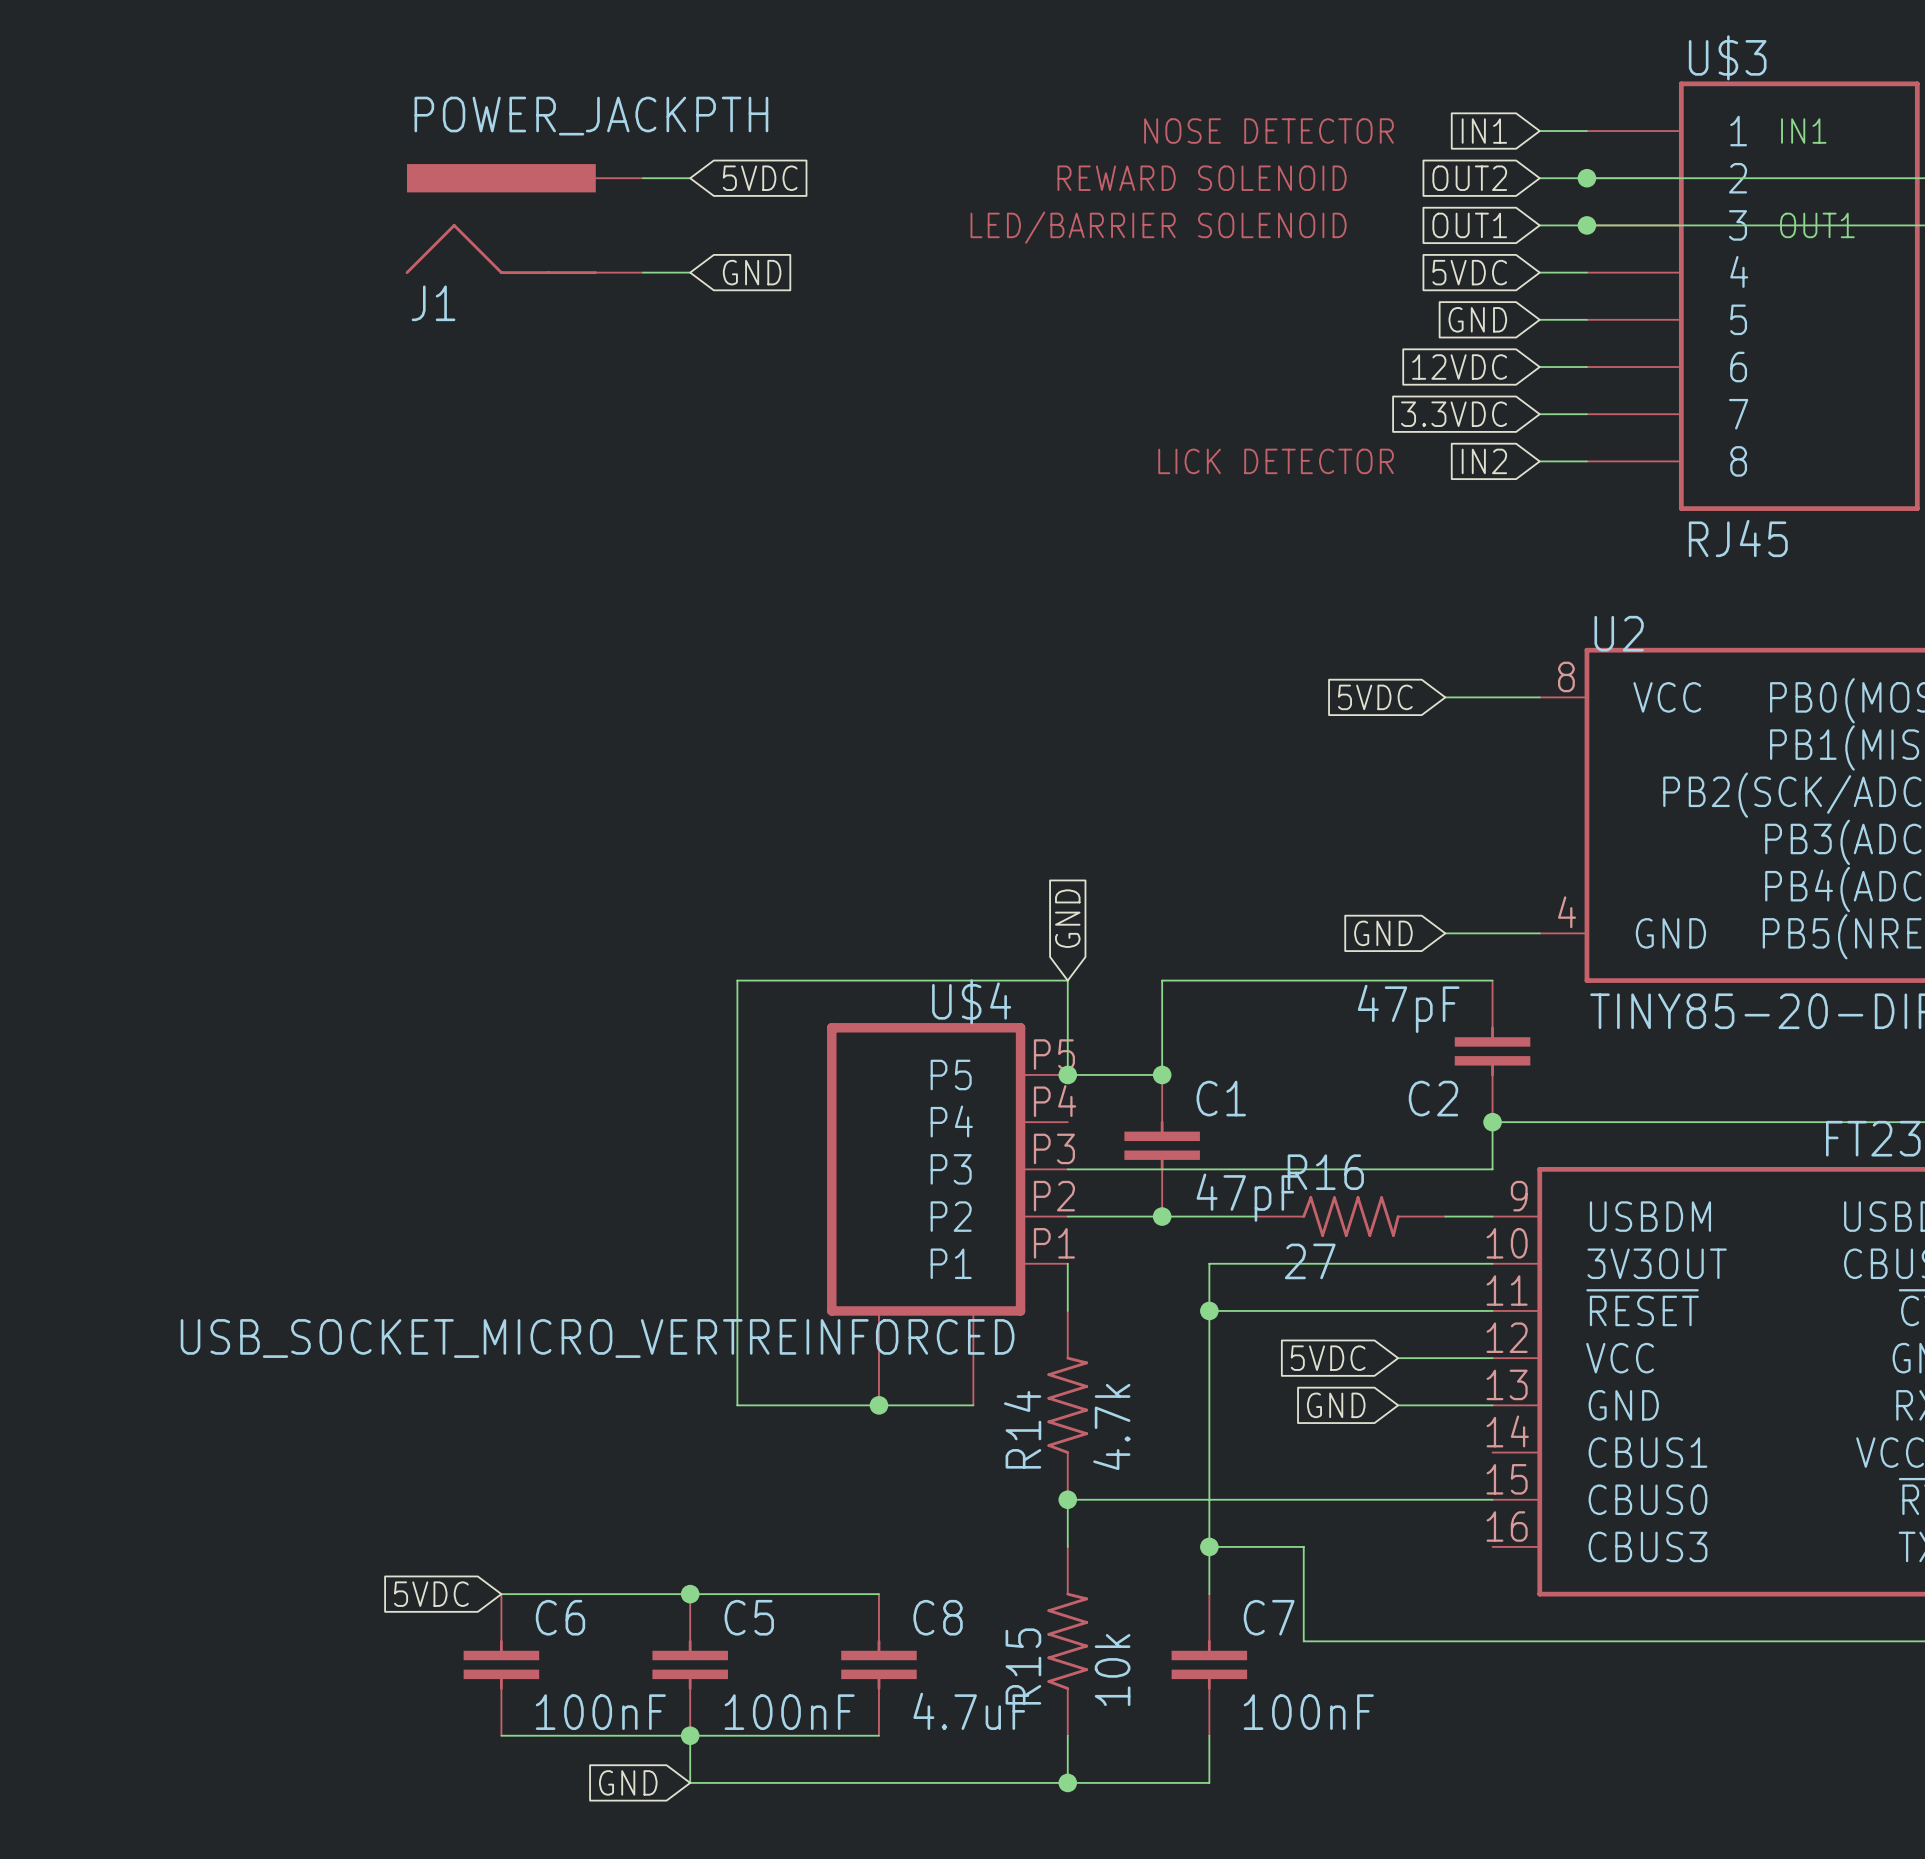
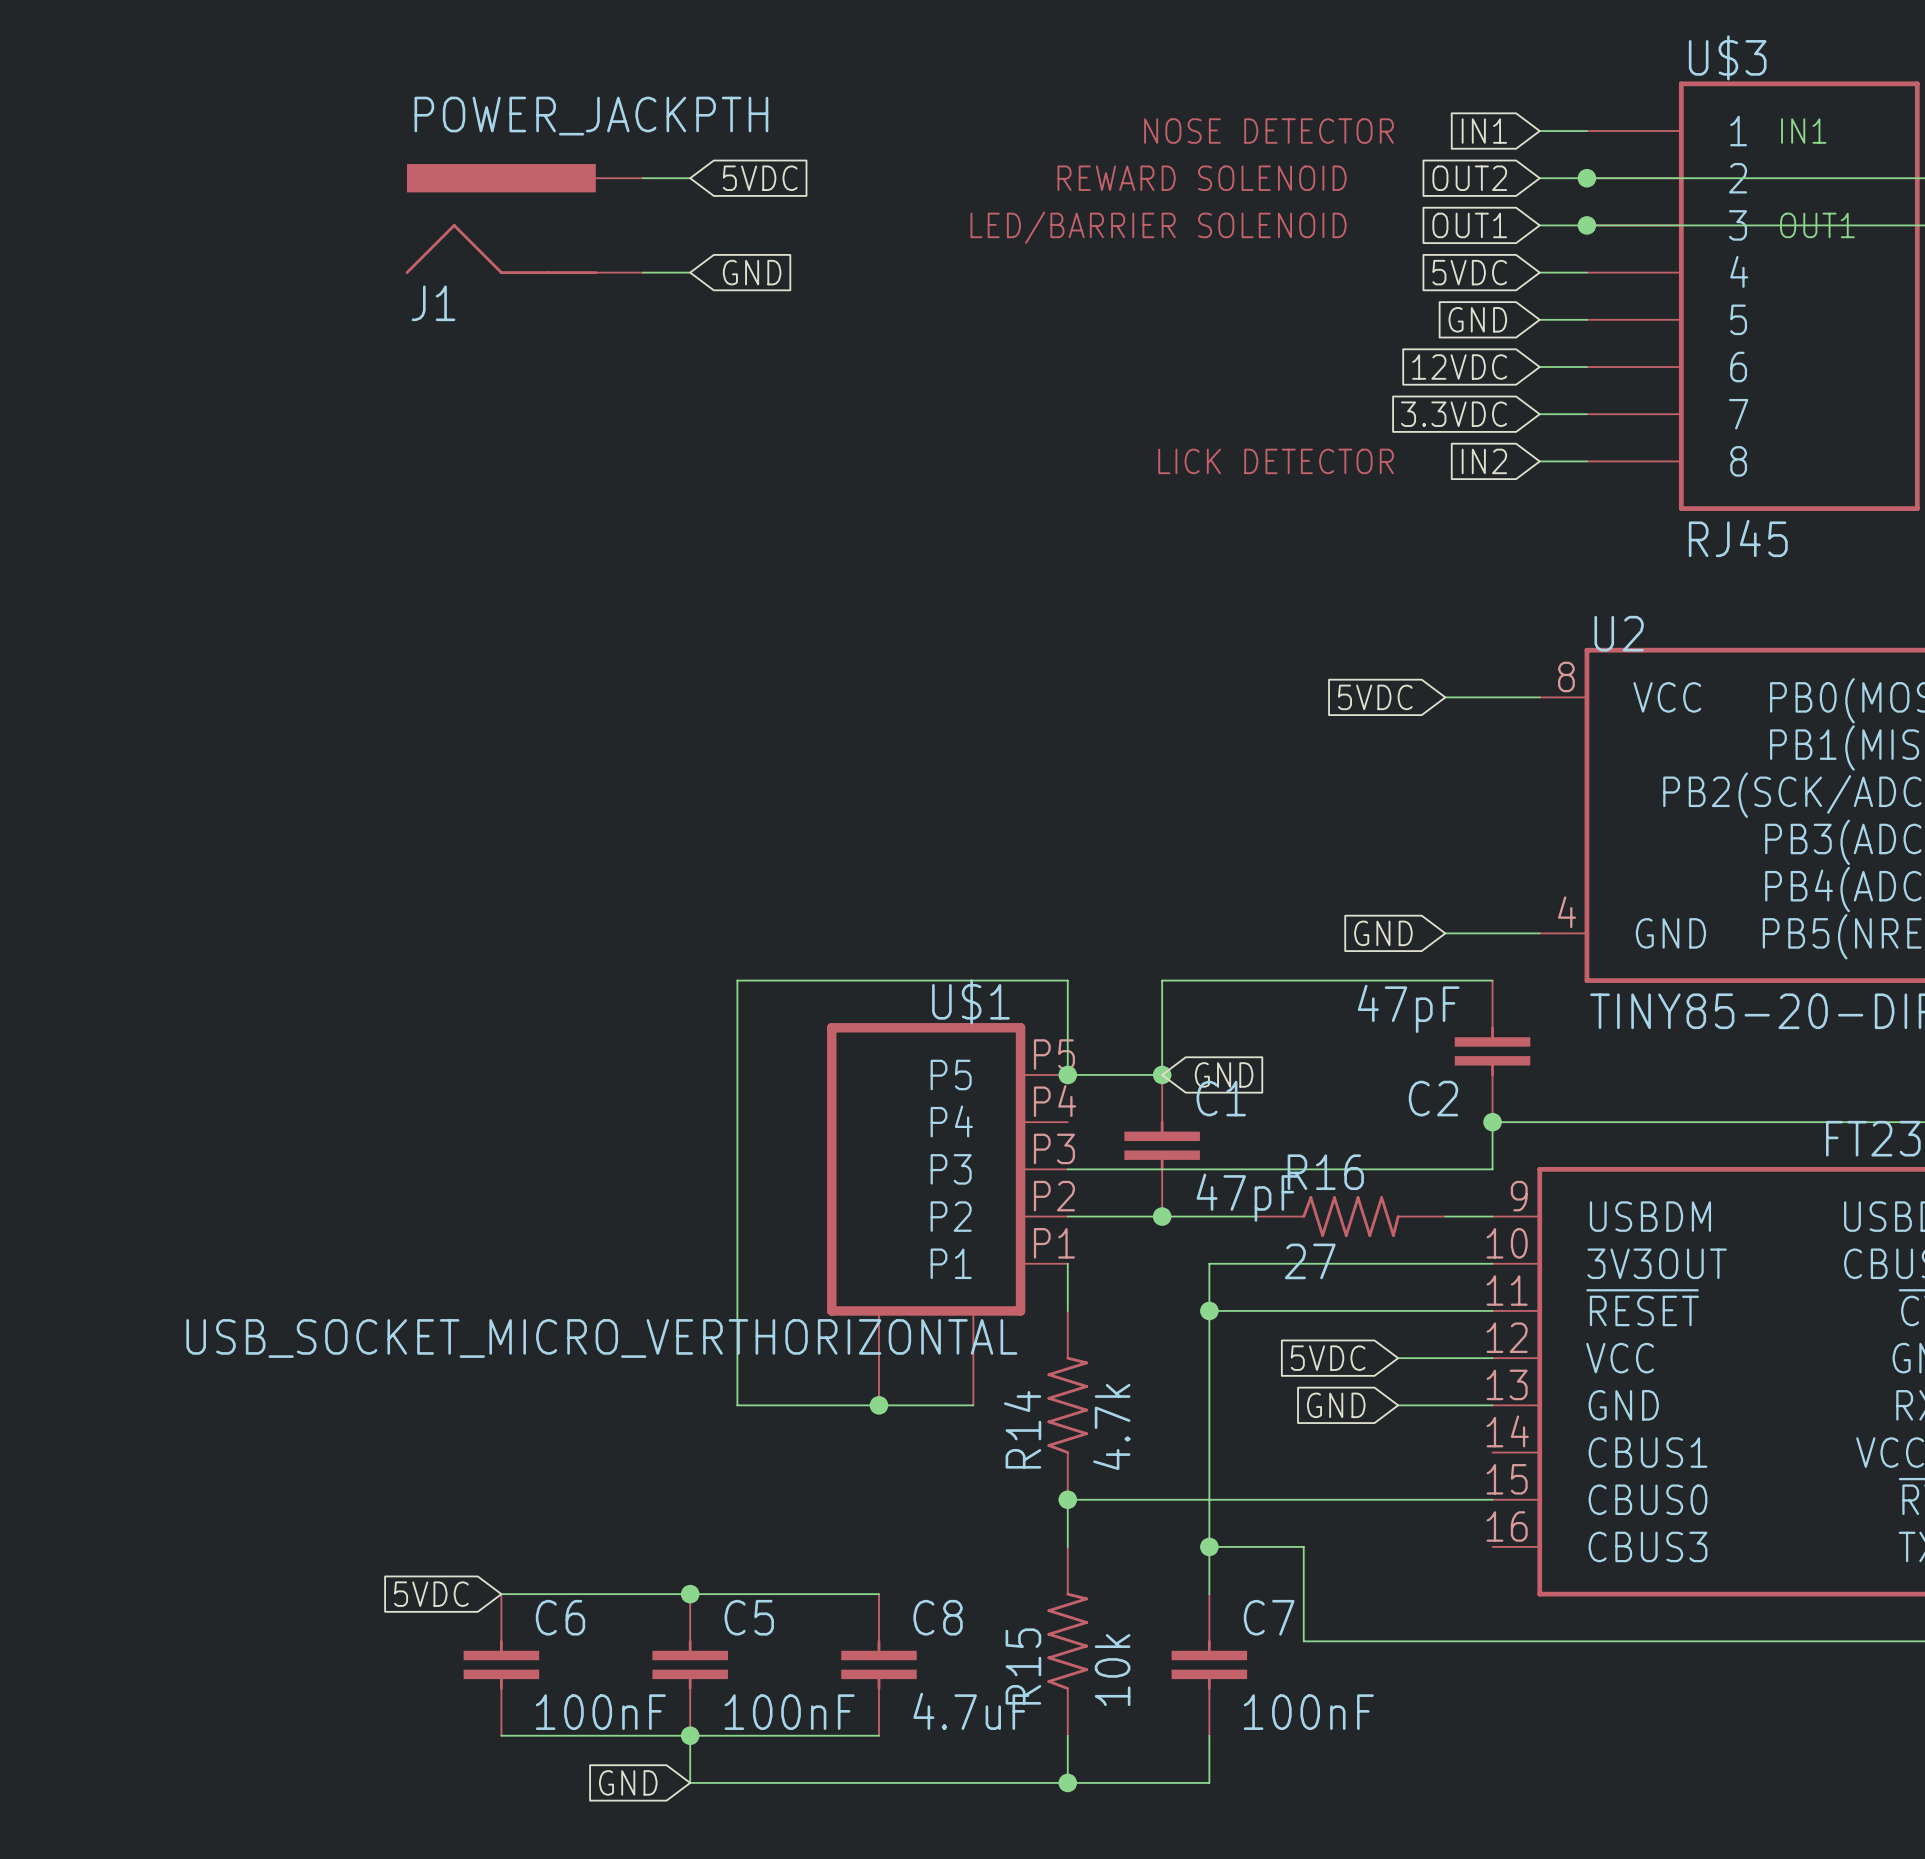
global label rotation: 0° (1067, 918) -> 90° clockwise (1224, 1074)
global label position: GND (1067, 918) -> GND (1224, 1074)
U$4 name: U$4 (971, 1001) -> U$1 (970, 1001)
U$4 value: USB_SOCKET_MICRO_VERTREINFORCED (597, 1338) -> USB_SOCKET_MICRO_VERTHORIZONTAL (601, 1338)

